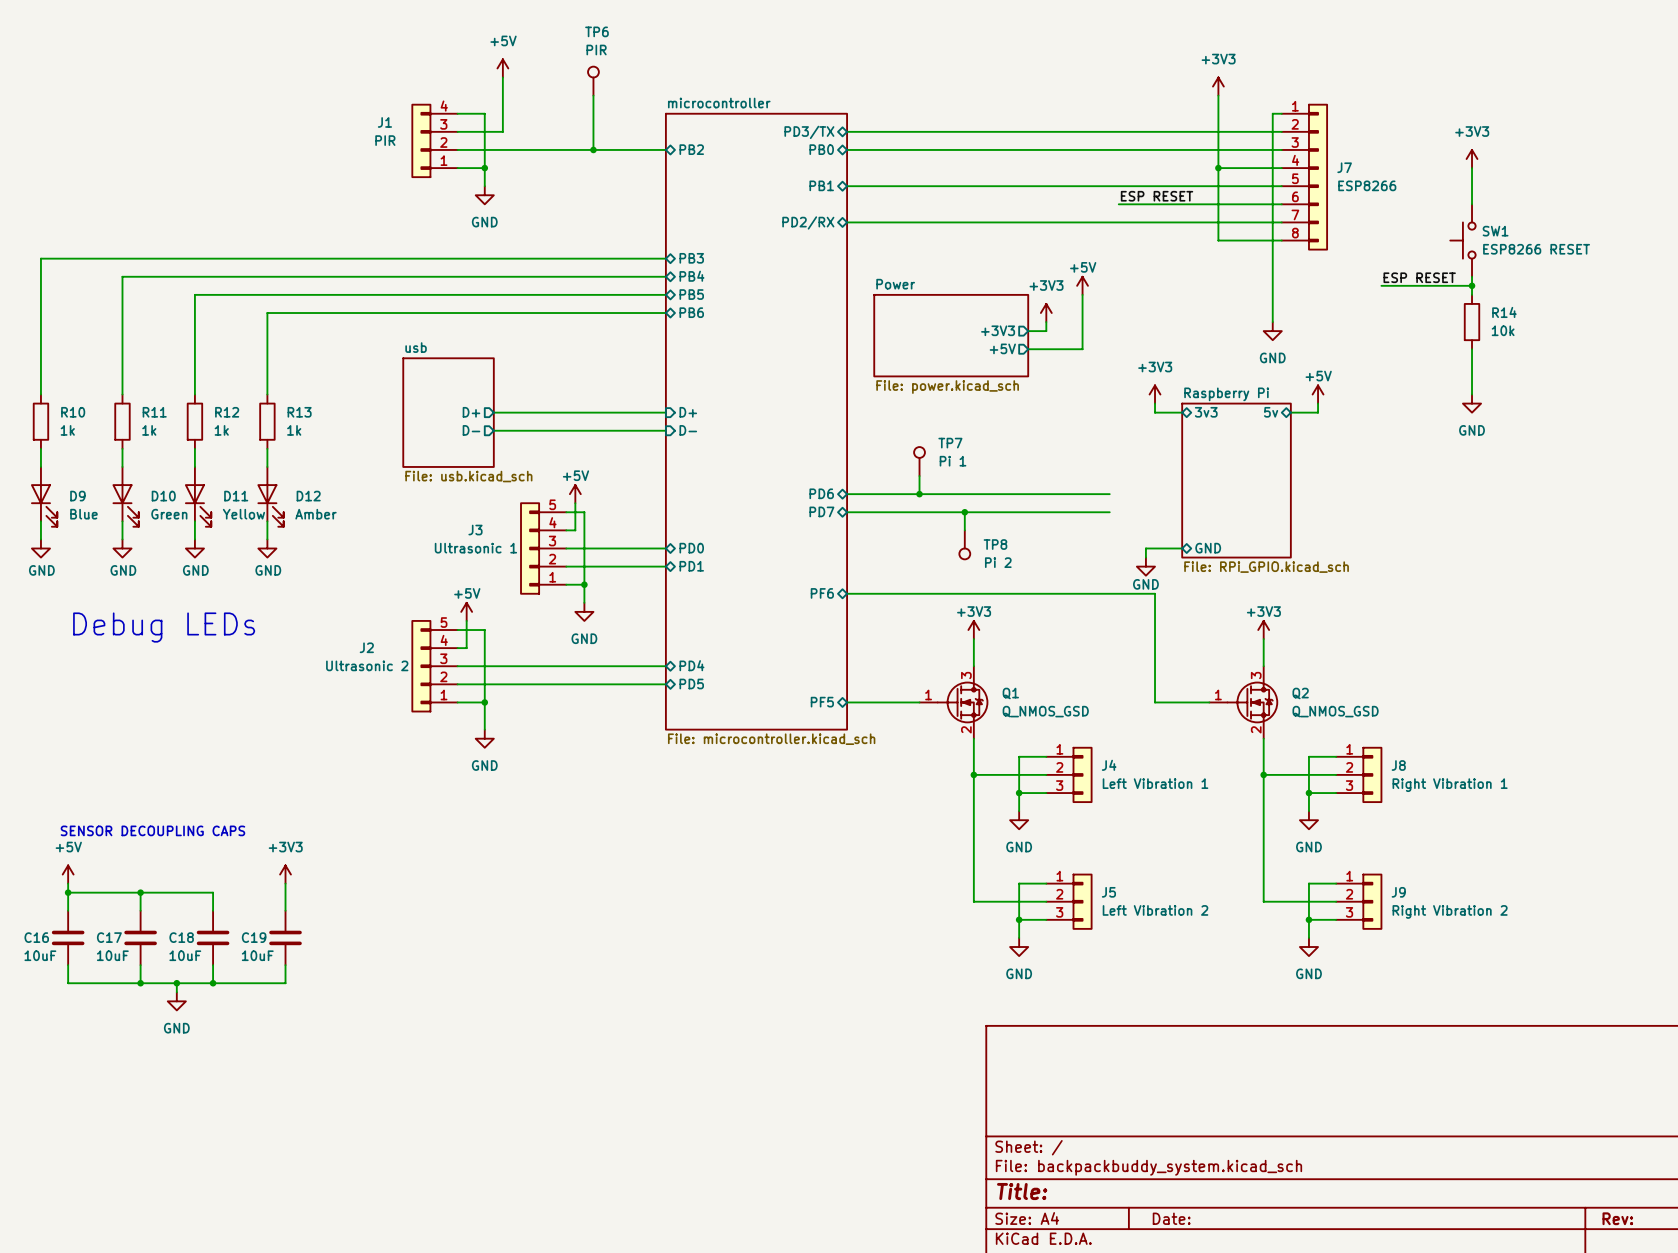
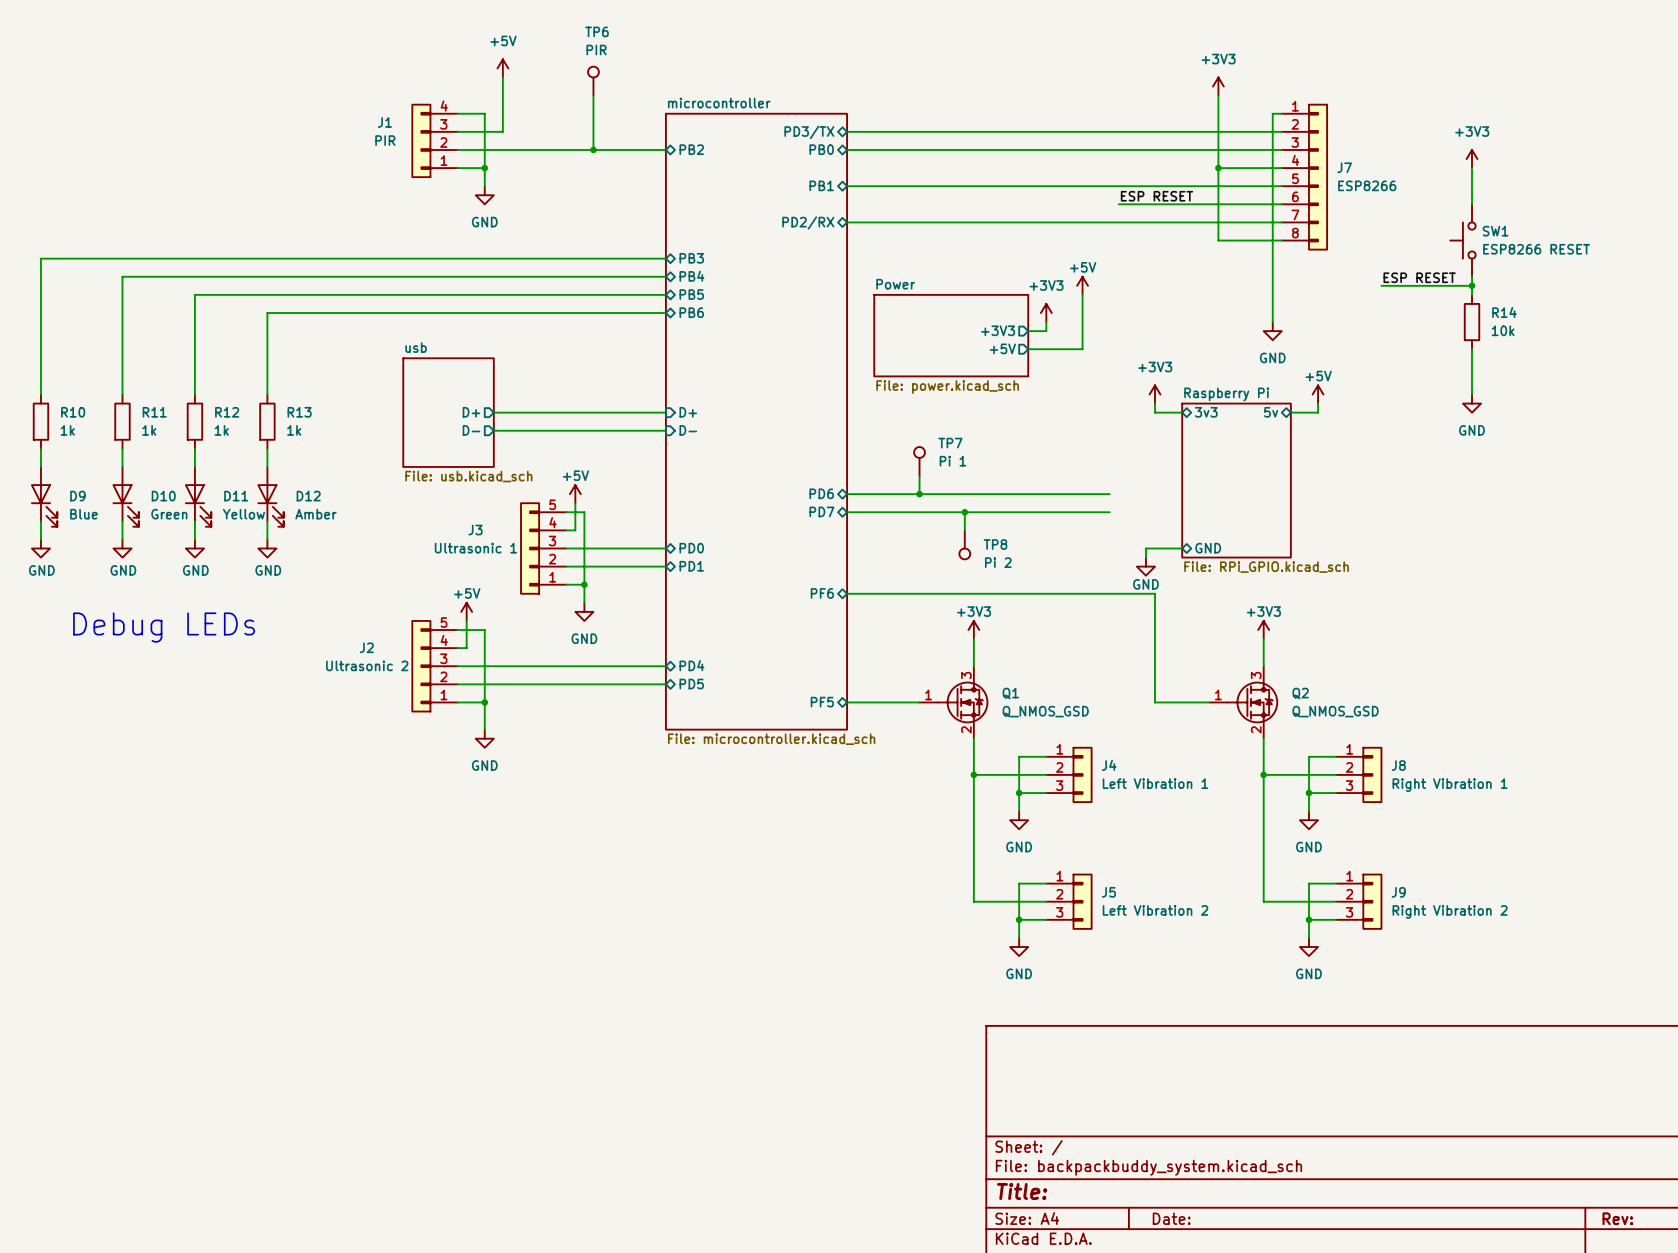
text: SENSOR DECOUPLING CAPS (152, 830) -> none
power symbol: +5V (68, 874) -> none
power symbol: +3V3 (285, 874) -> none
wire: (68, 883) (68, 910) -> none
wire: (285, 883) (285, 910) -> none
wire: (68, 892) (213, 892) (213, 910) -> none
junction: (68, 892) -> none
wire: (140, 892) (140, 910) -> none
junction: (140, 892) -> none
C16: 10uF (68, 937) -> none
C17: 10uF (140, 937) -> none
C18: 10uF (213, 937) -> none
C19: 10uF (285, 937) -> none
wire: (68, 965) (68, 983) (285, 983) (285, 965) -> none
wire: (140, 965) (140, 983) -> none
wire: (213, 965) (213, 983) -> none
junction: (140, 983) -> none
wire: (176, 983) (176, 992) -> none
junction: (176, 983) -> none
junction: (213, 983) -> none
power symbol: GND (176, 1001) -> none

